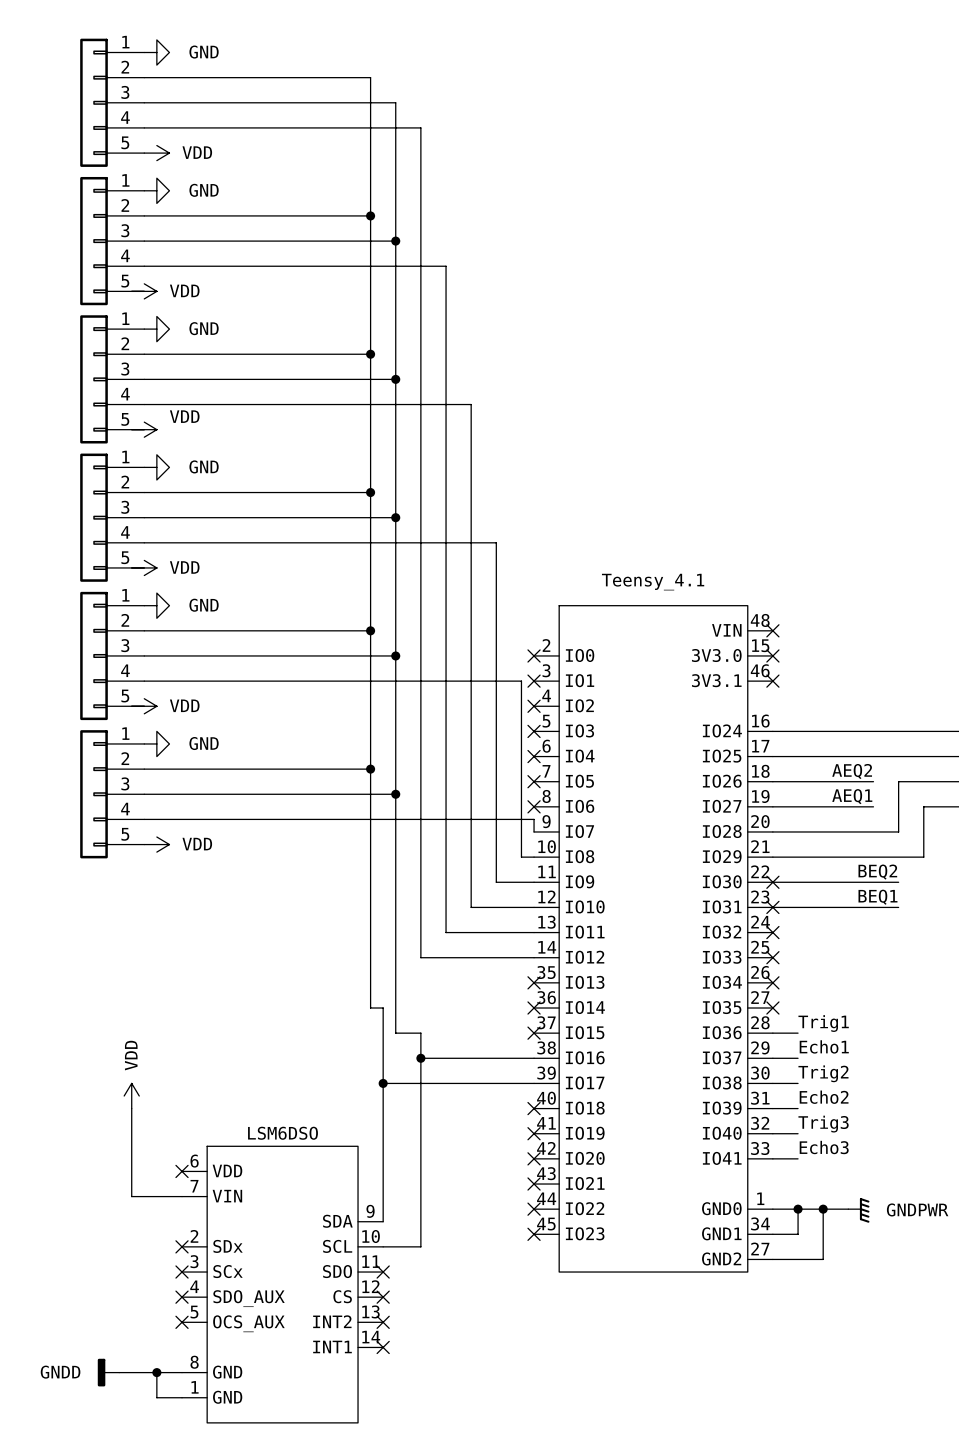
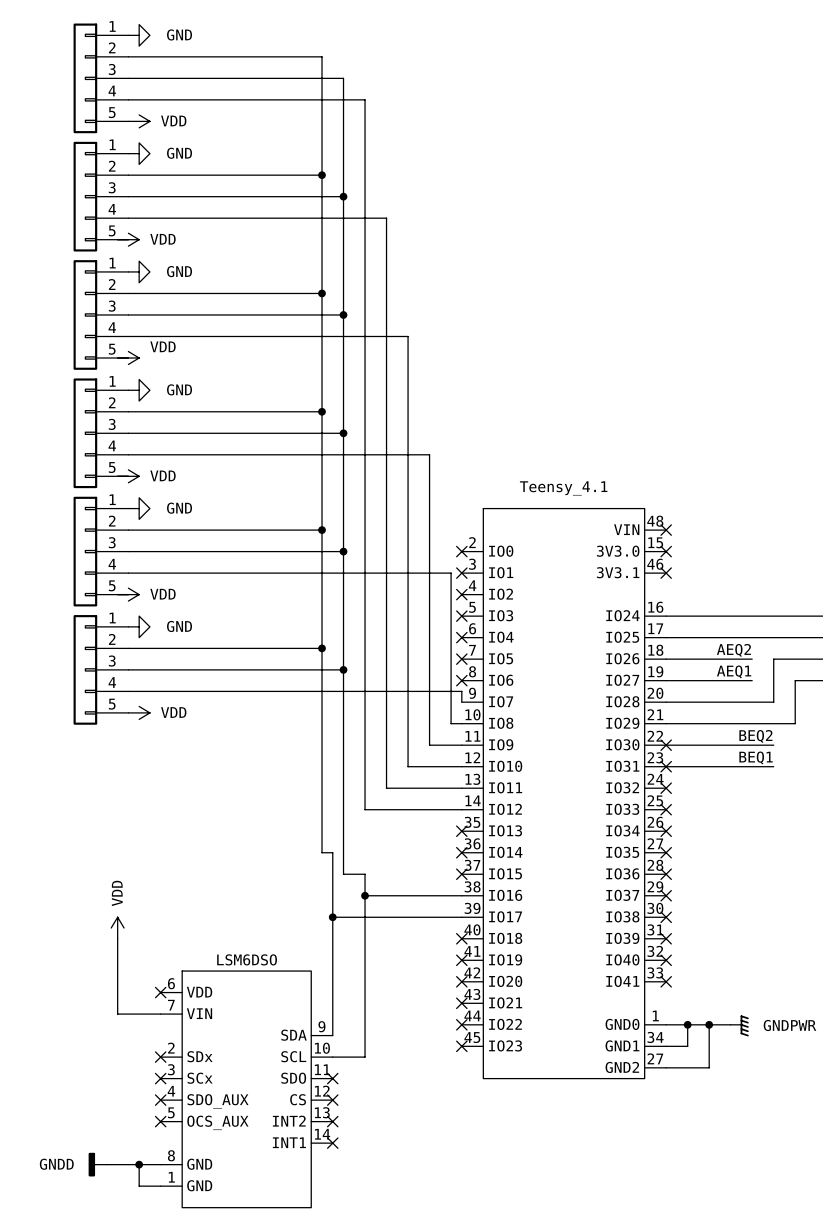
label: Trig1 (823, 1023) -> none
wire: (772, 1033) (798, 1033) -> none
no-connect mark: none -> (666, 874)
label: Echo1 (824, 1046) -> none
wire: (772, 1058) (798, 1058) -> none
no-connect mark: none -> (666, 895)
label: Trig2 (823, 1073) -> none
wire: (772, 1083) (798, 1083) -> none
no-connect mark: none -> (666, 917)
label: Echo2 (824, 1097) -> none
wire: (772, 1108) (798, 1108) -> none
no-connect mark: none -> (666, 938)
label: Trig3 (823, 1124) -> none
wire: (772, 1133) (798, 1133) -> none
no-connect mark: none -> (666, 960)
label: Echo3 (824, 1147) -> none
wire: (772, 1158) (798, 1158) -> none
no-connect mark: none -> (666, 981)

